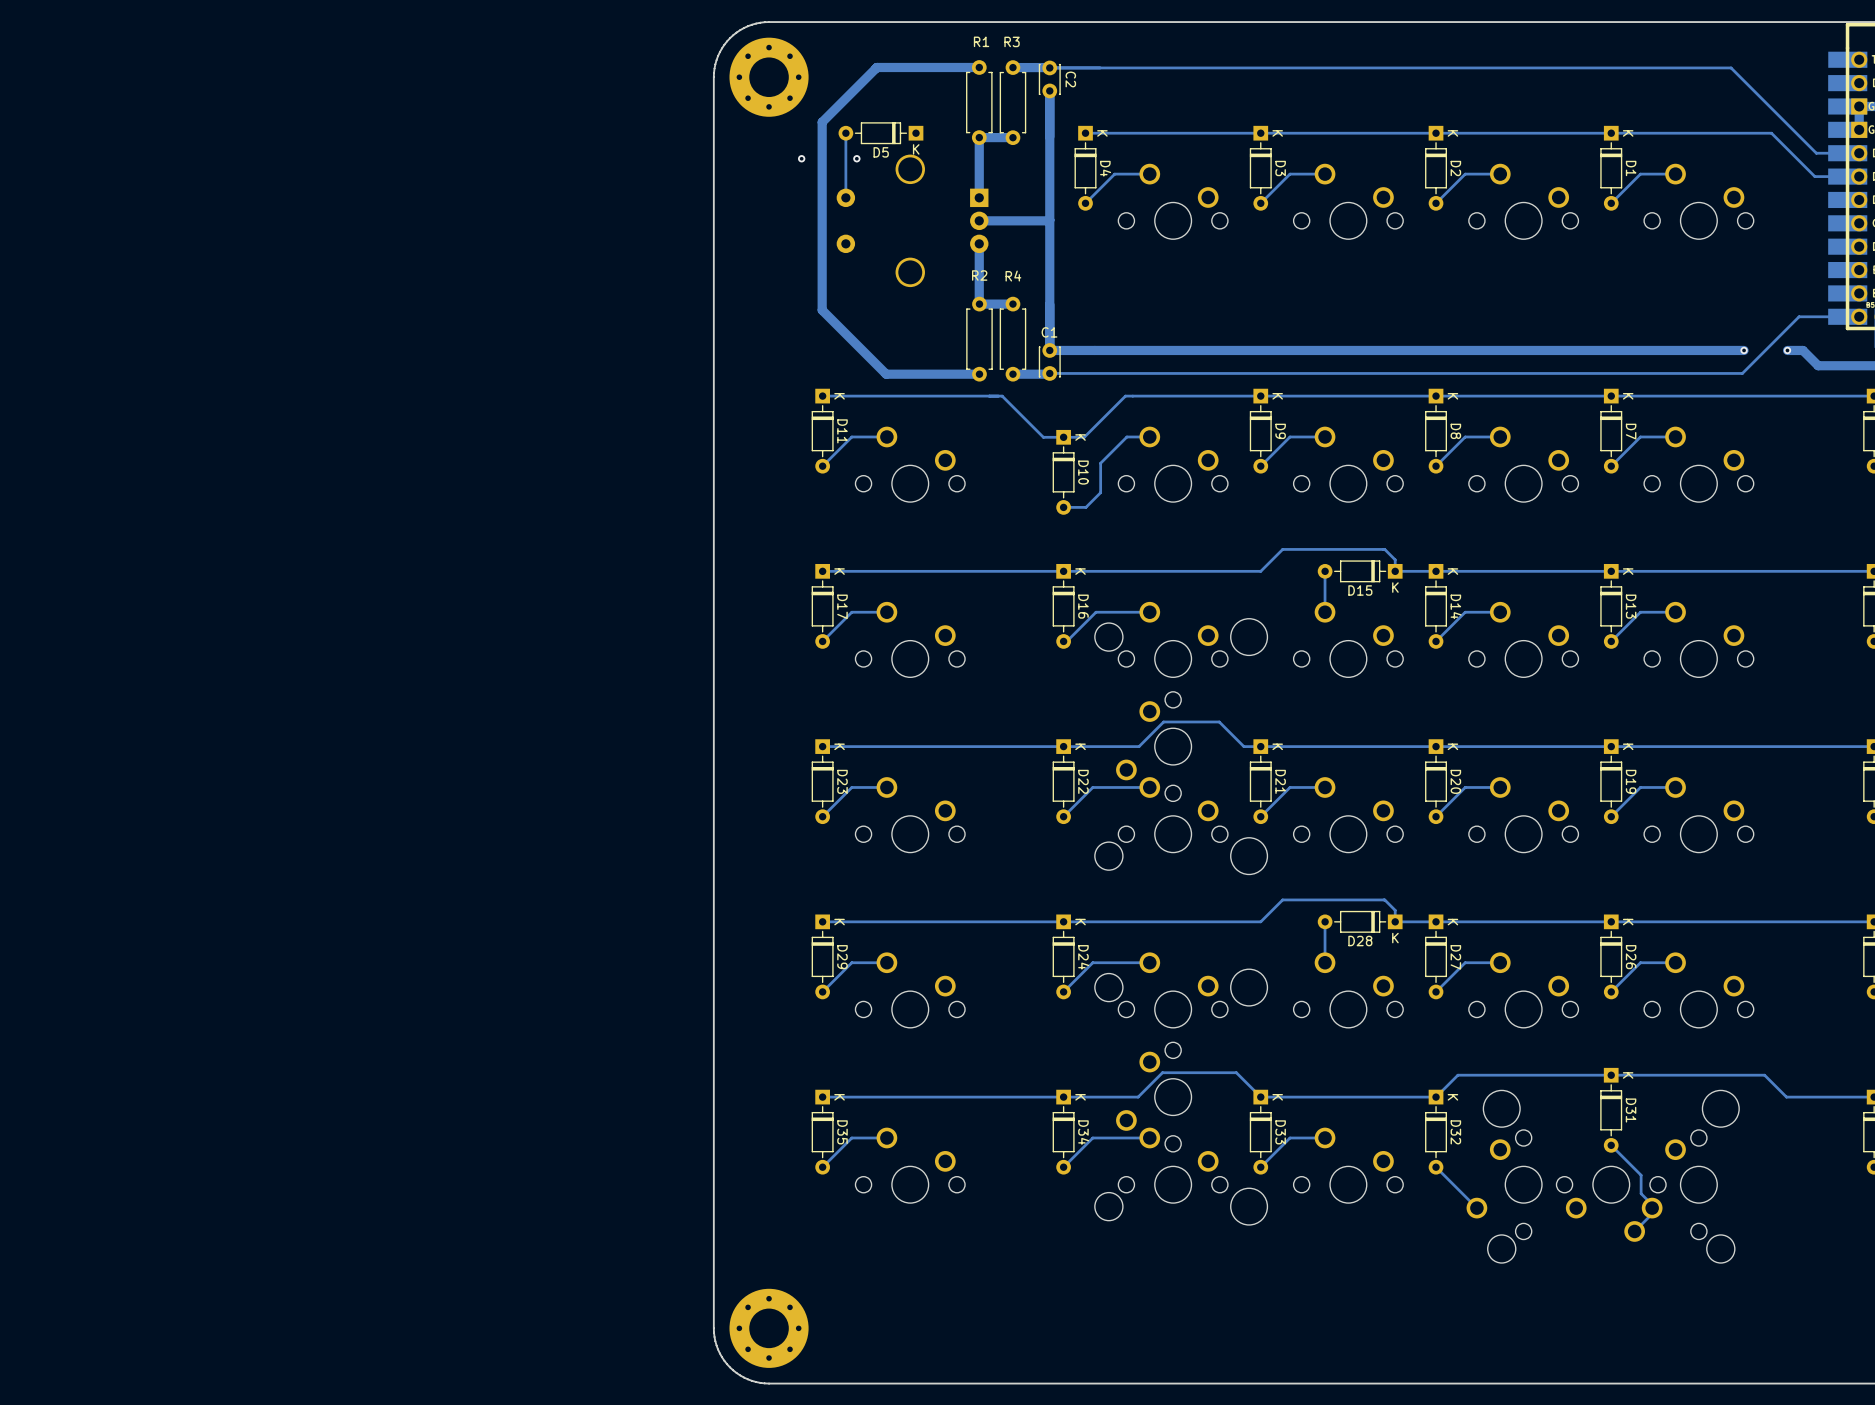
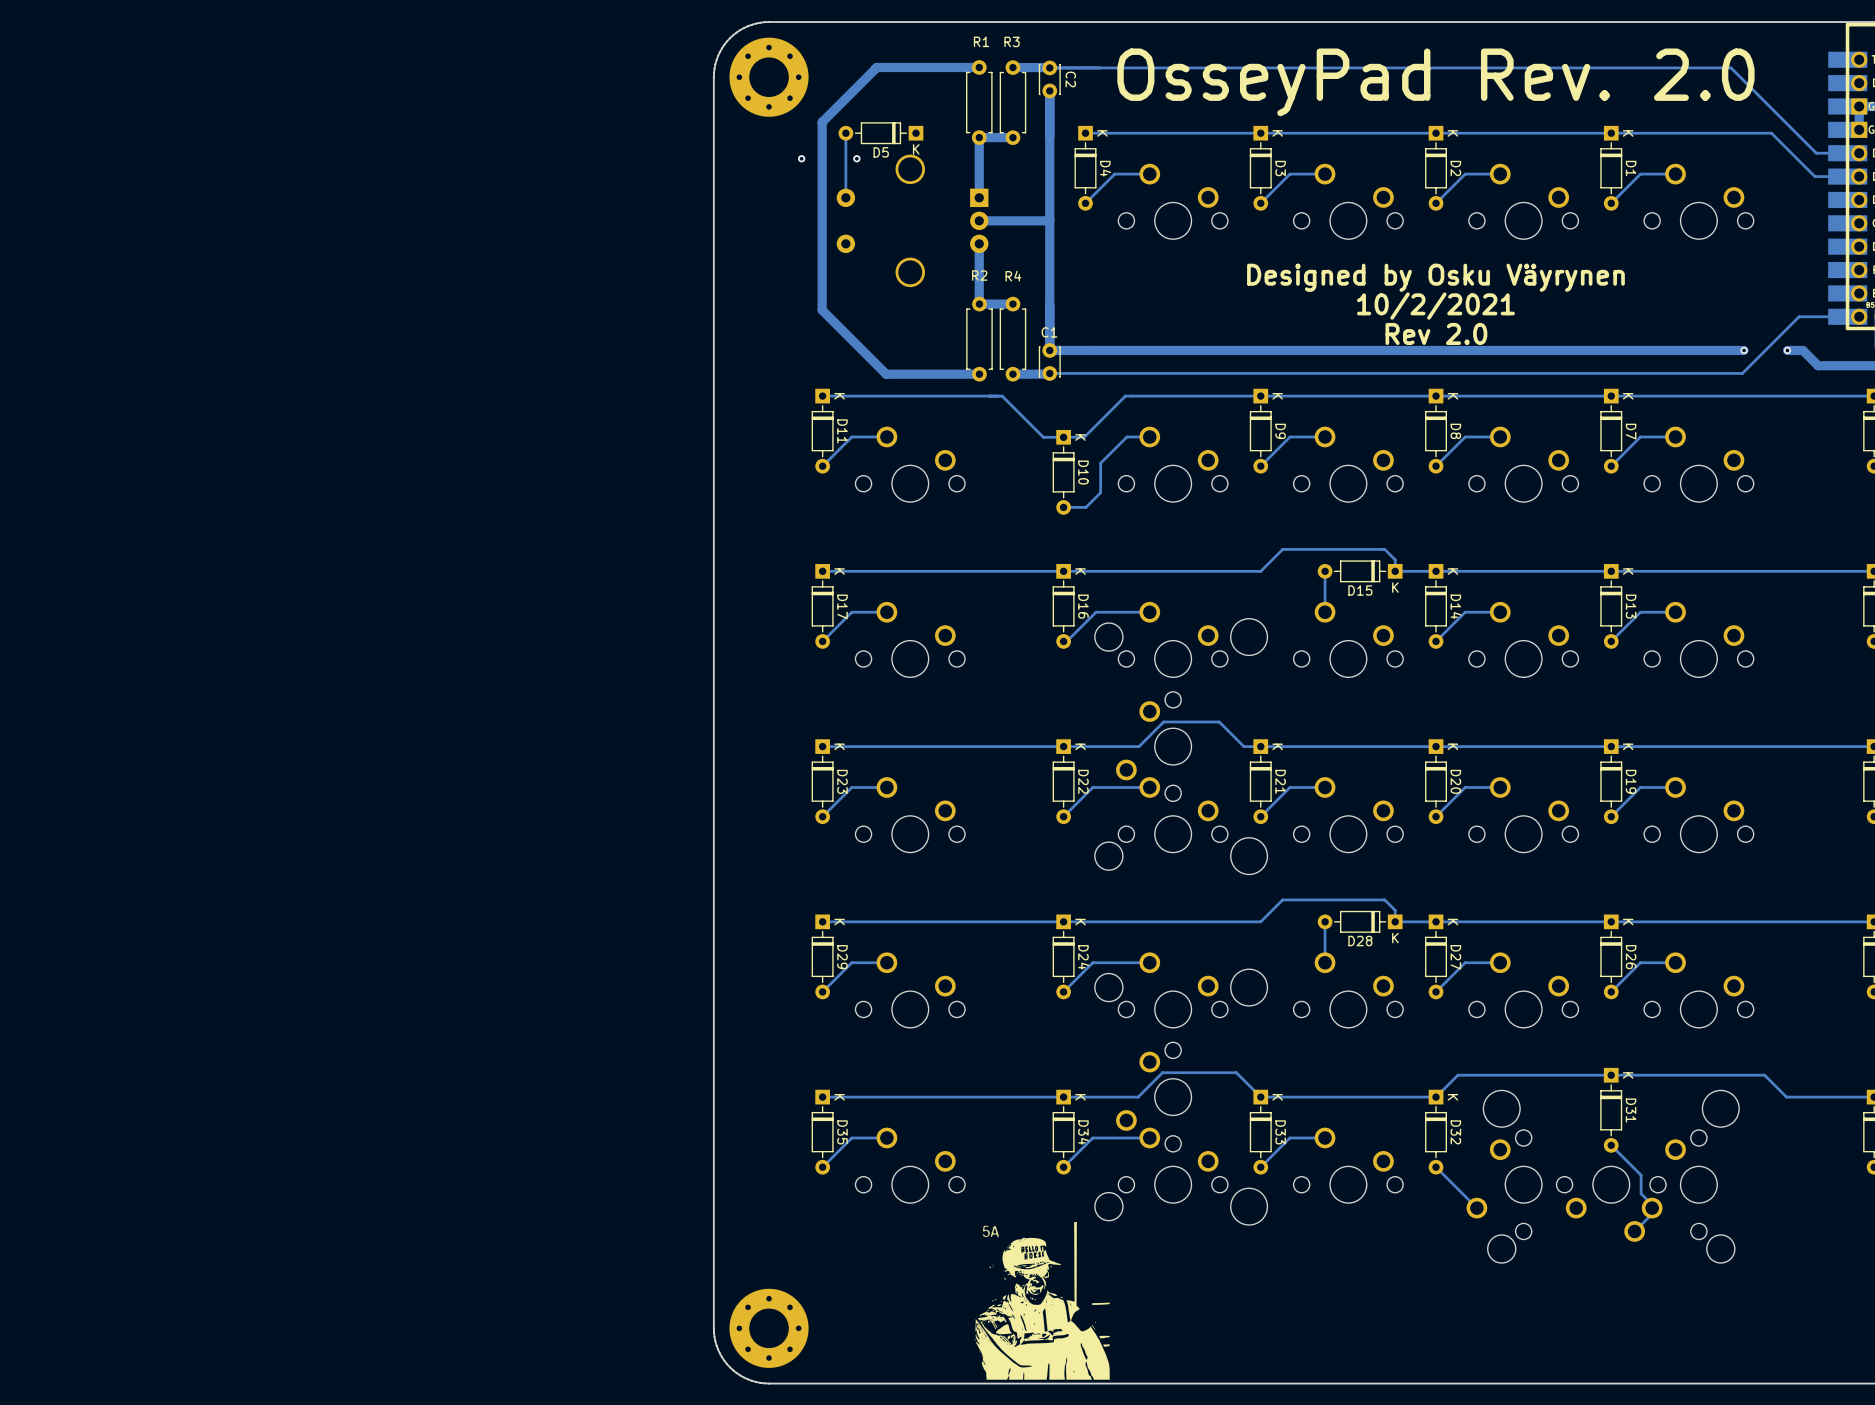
text: none -> OsseyPad Rev. 2.0 (1435, 82)
text: none -> Designed by Osku Väyrynen (1435, 277)
text: none -> 10/2/2021 (1435, 306)
text: none -> Rev 2.0 (1436, 333)
drawing: none -> [974, 1222, 1110, 1380]

